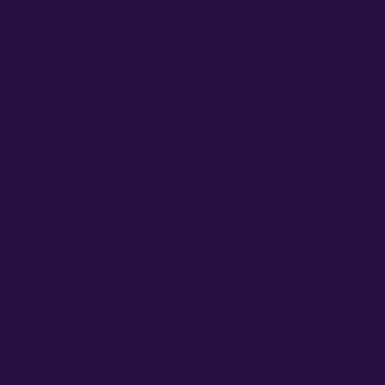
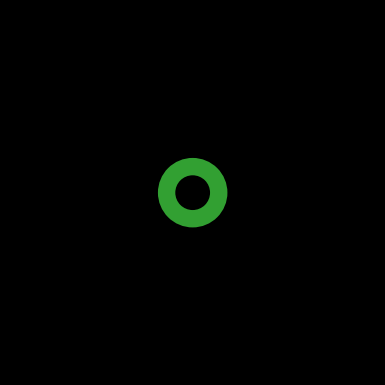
via: none -> (192, 192)

